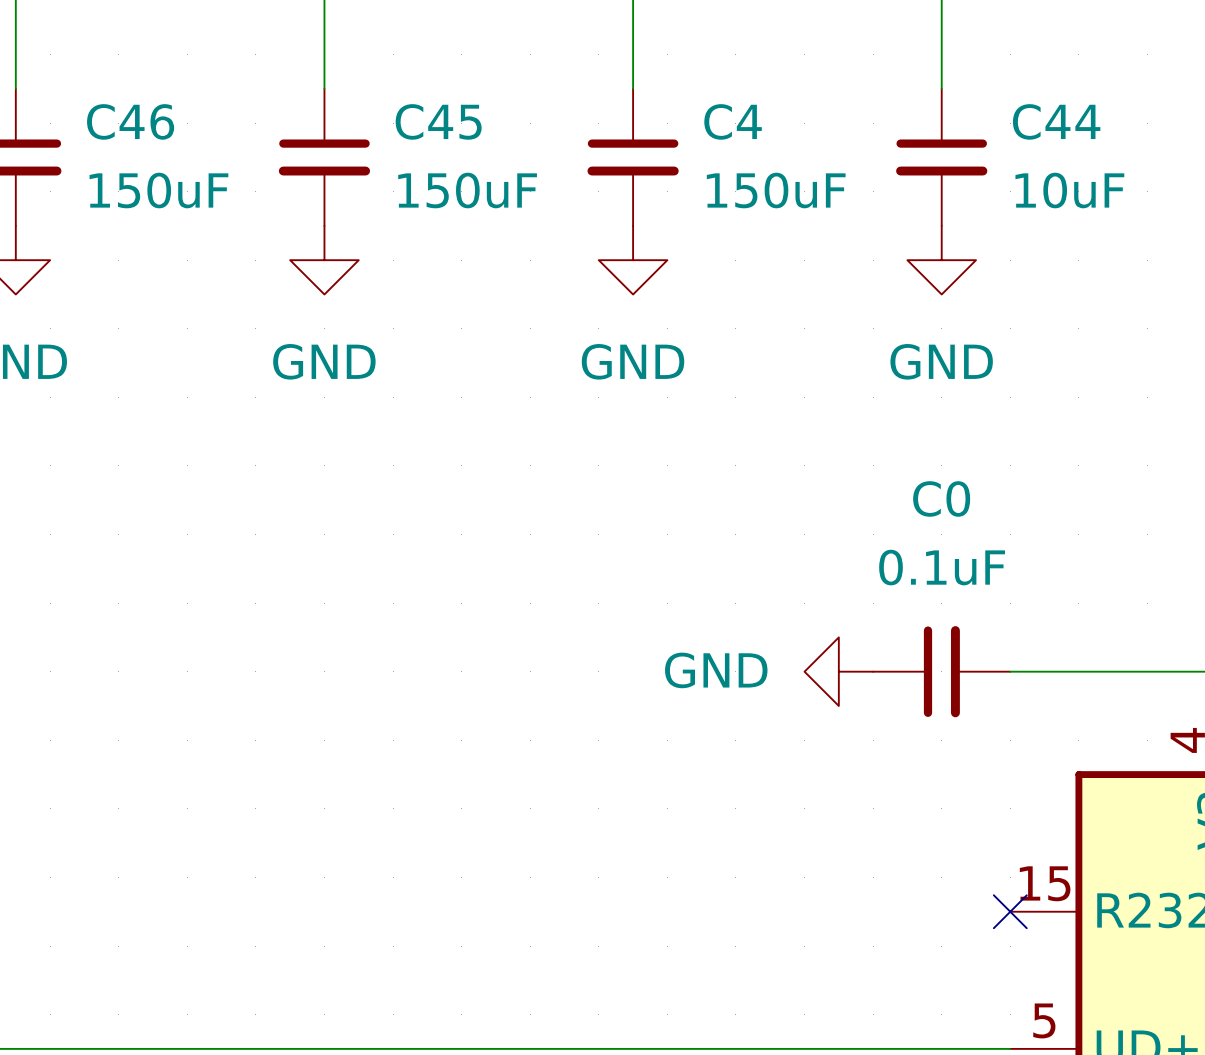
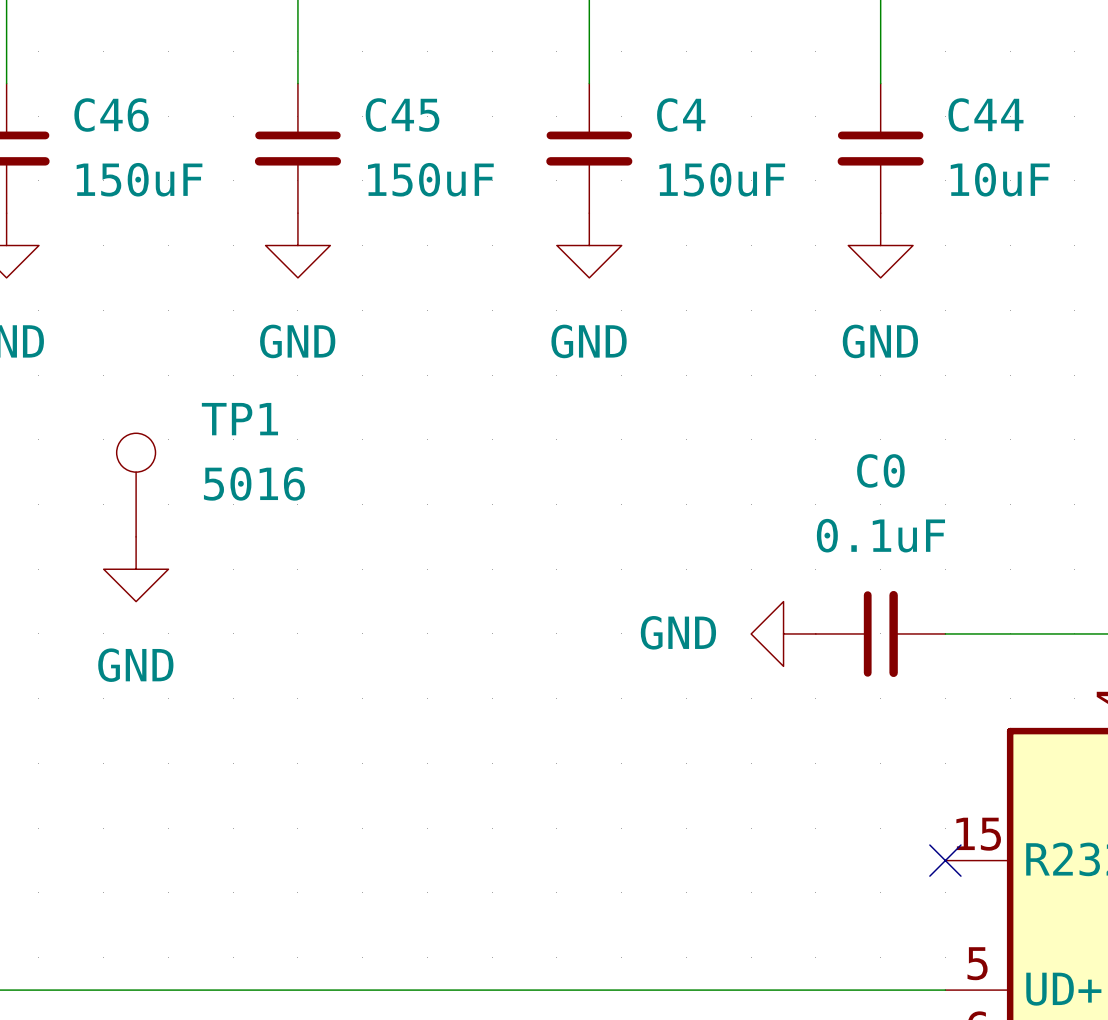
TP1: none -> 5016 (136, 485)
power symbol: none -> GND (136, 569)

